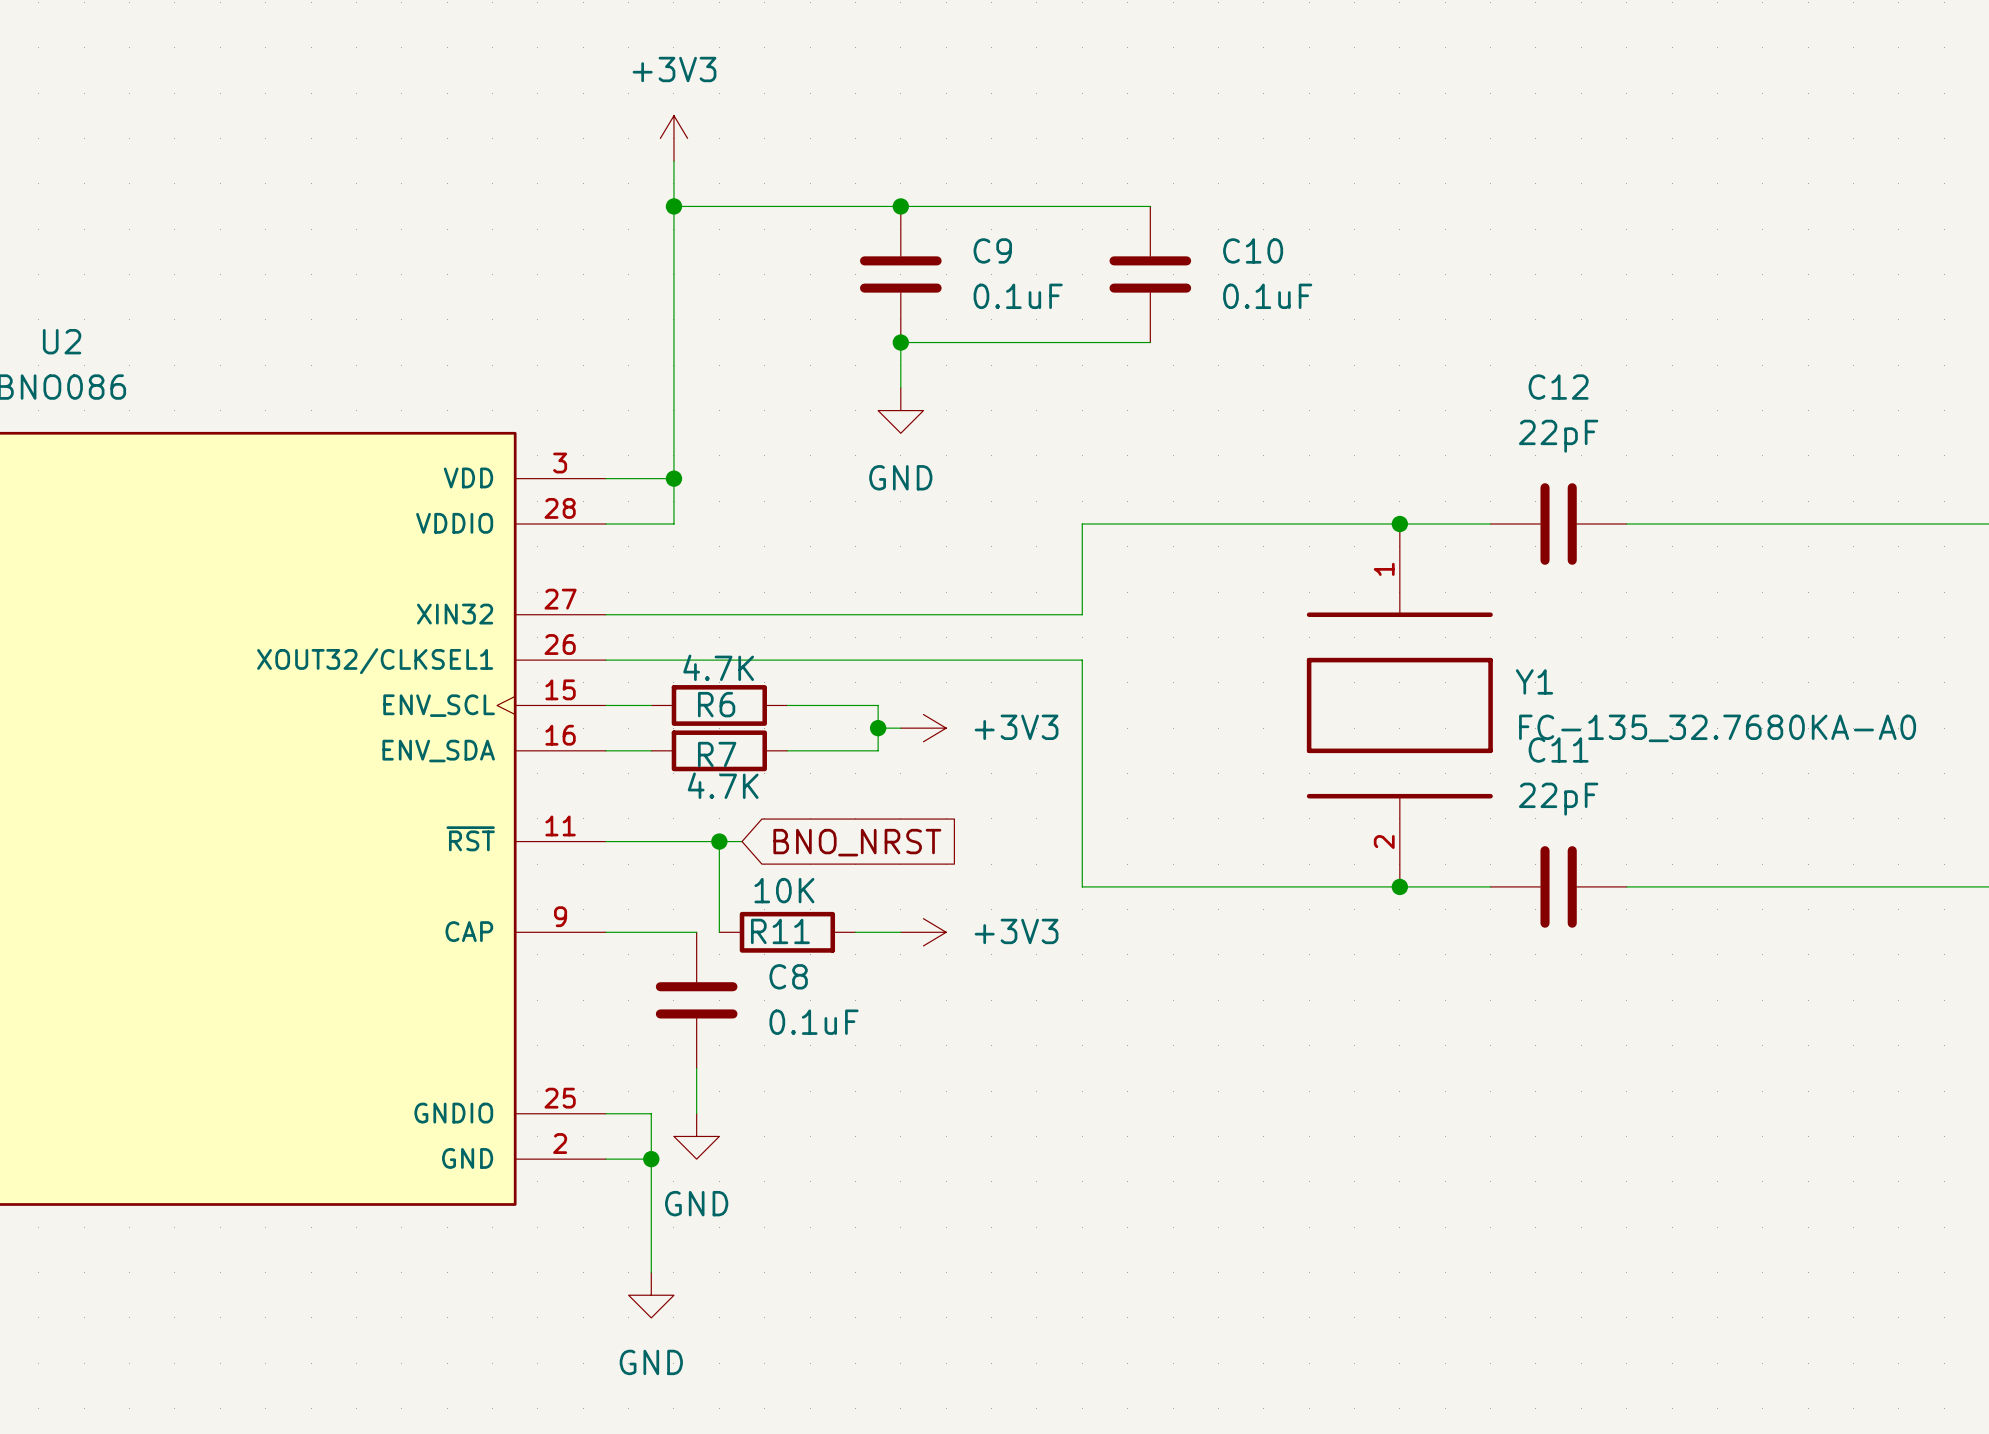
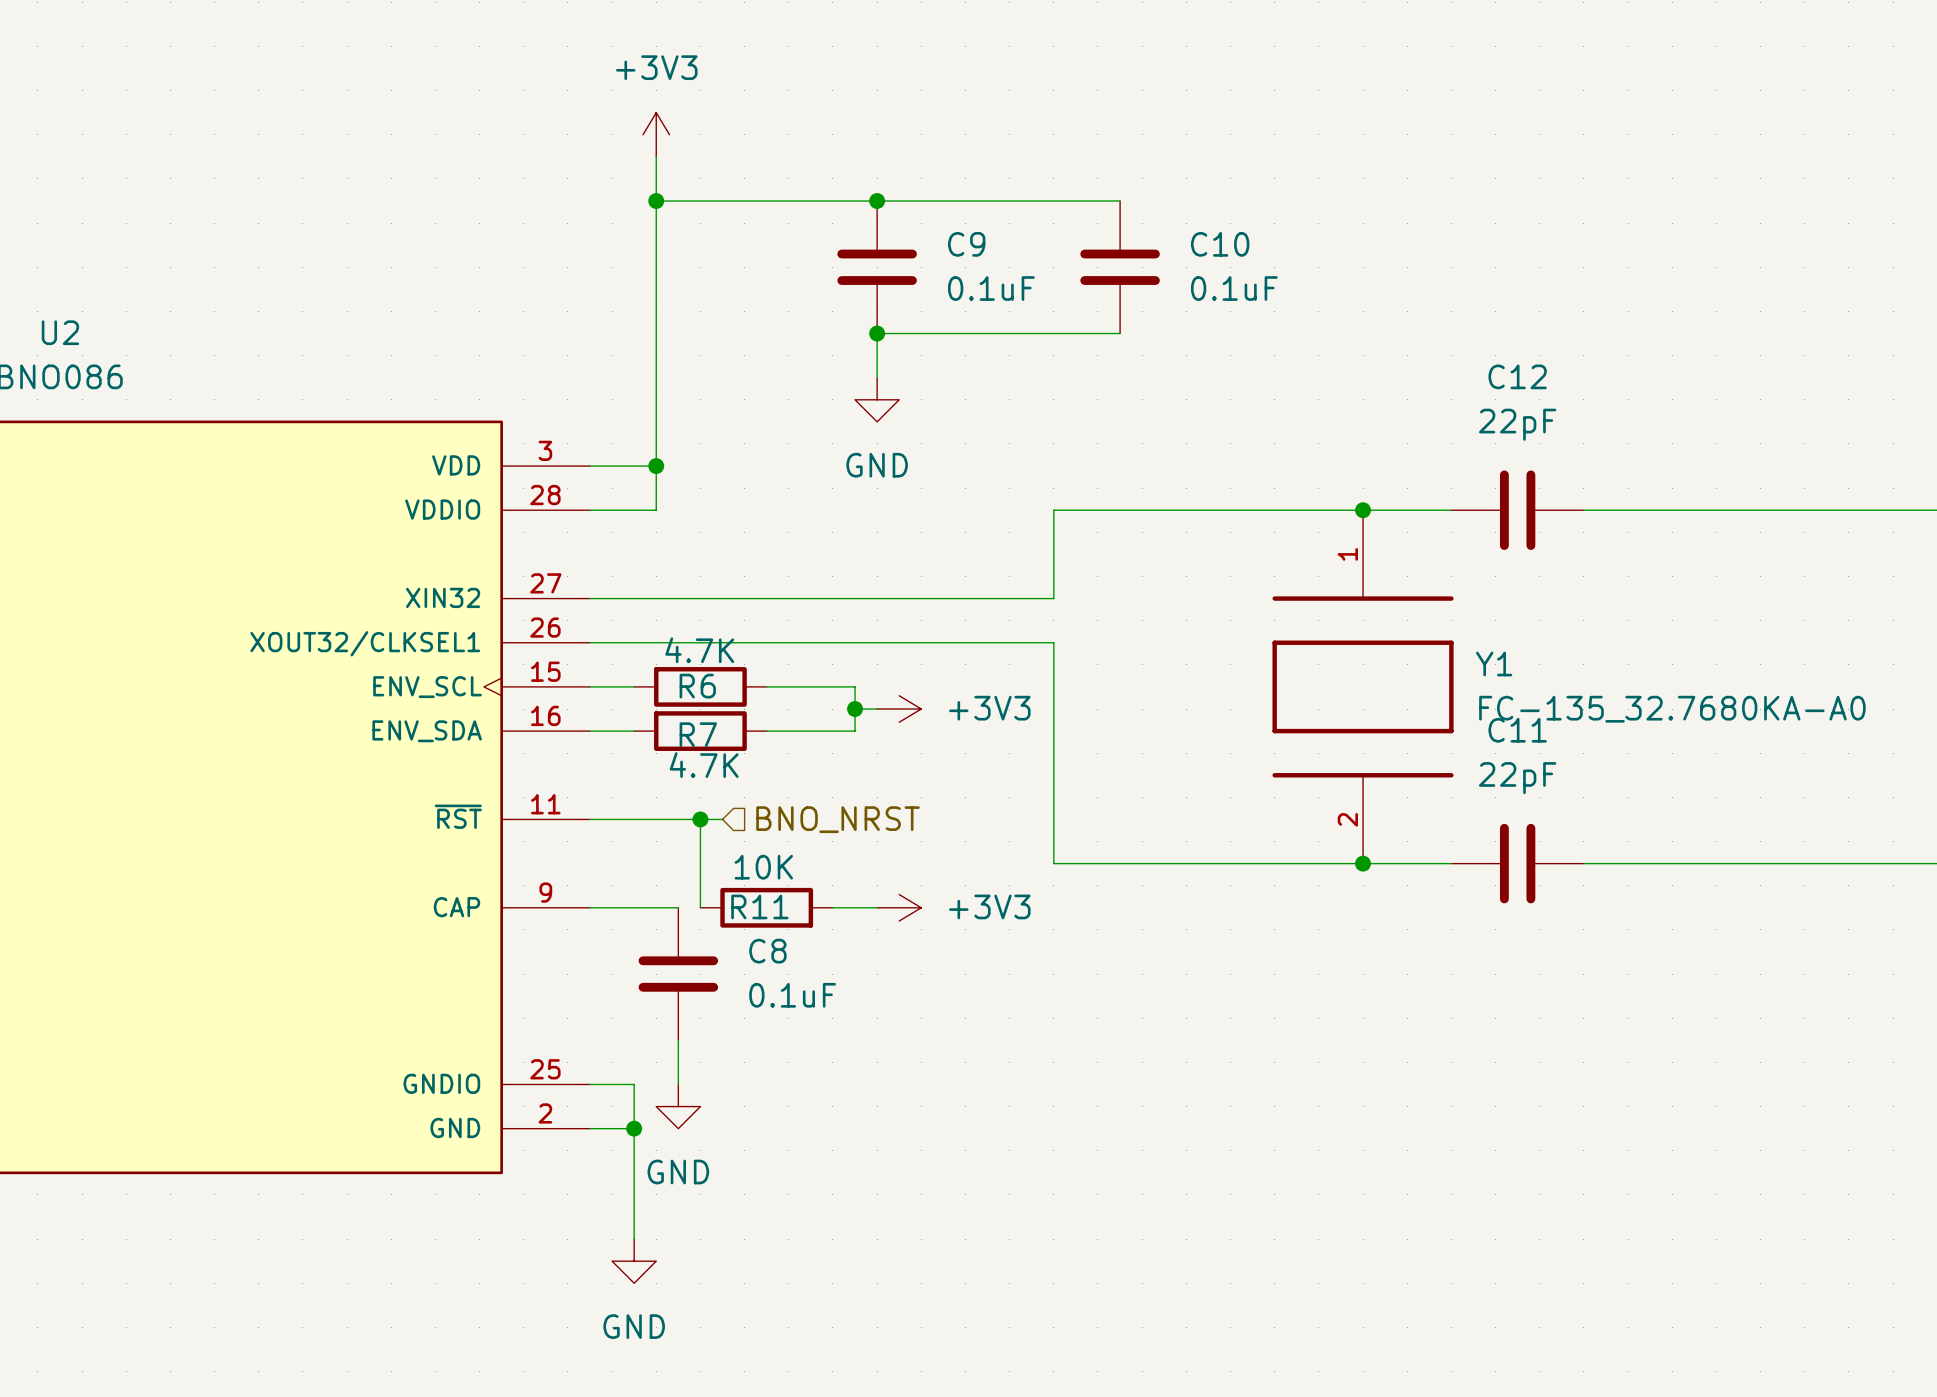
hierarchical label: none -> BNO_NRST (838, 819)
global label: BNO_NRST (857, 842) -> none

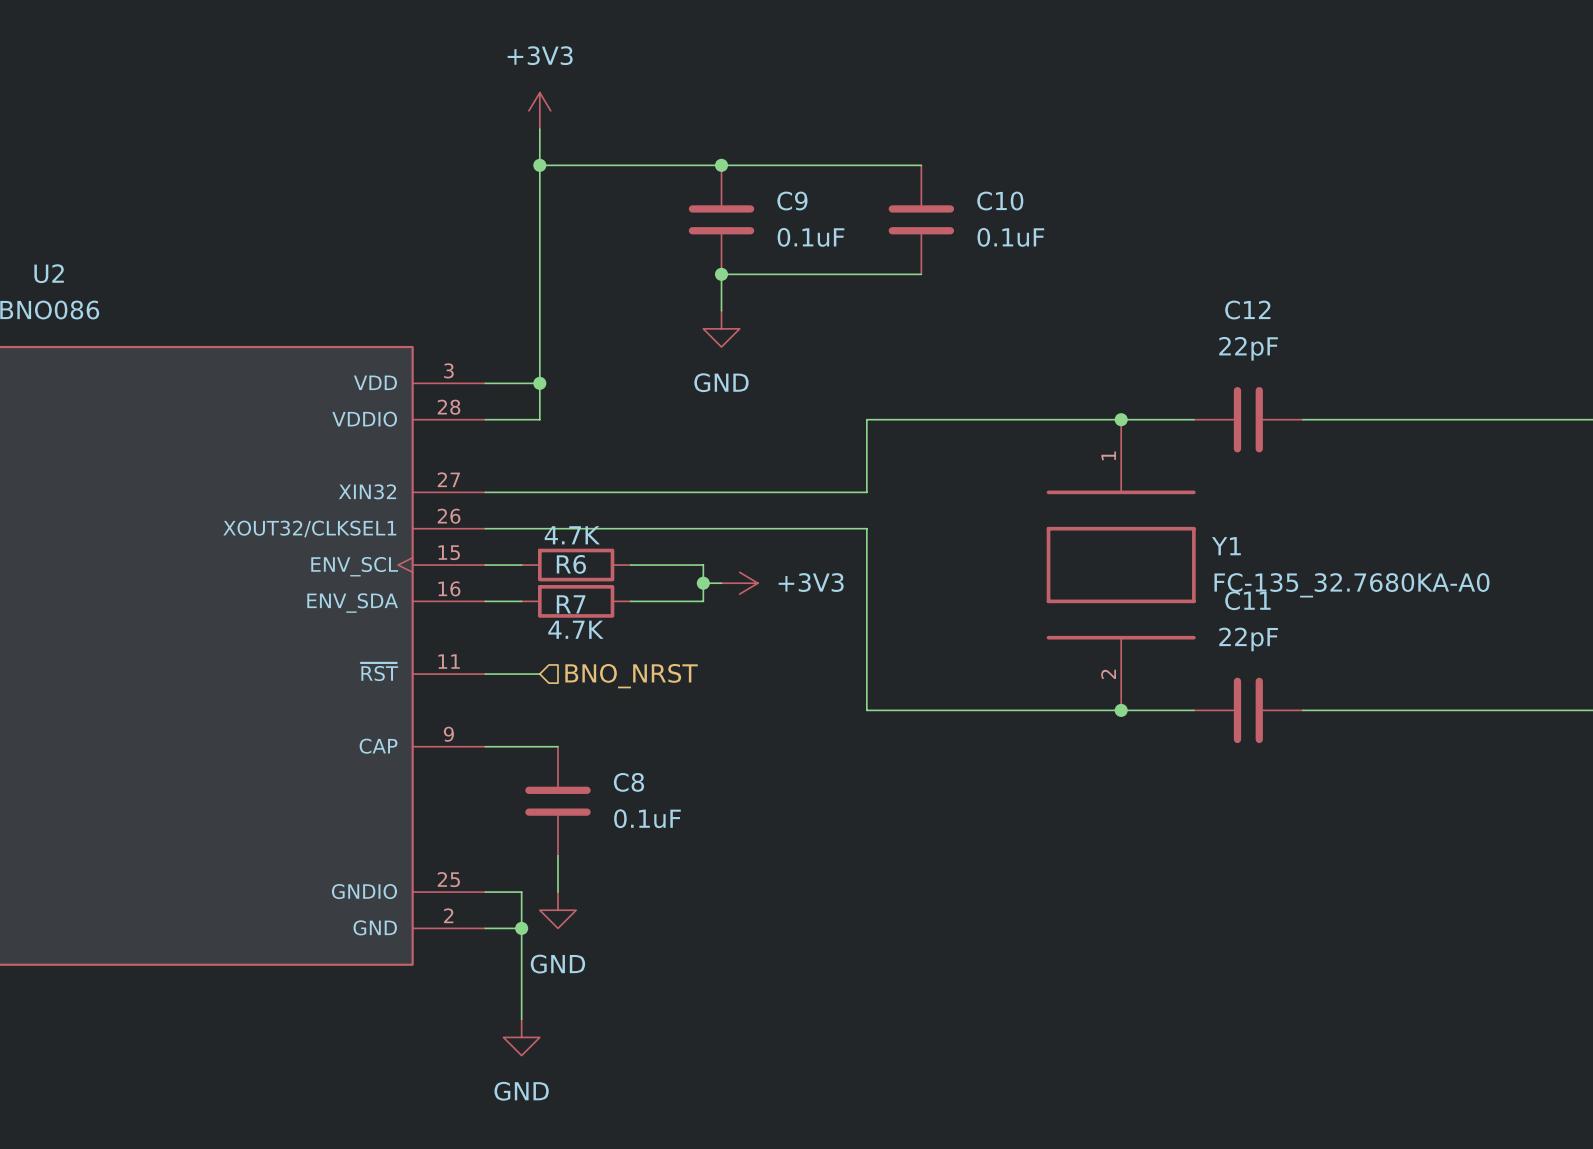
wire: (656, 819) (722, 819) -> none
wire: (700, 819) (700, 907) -> none
junction: (700, 819) -> none
hierarchical label position: BNO_NRST (838, 819) -> BNO_NRST (631, 676)
R11: 10K (766, 907) -> none
wire: (832, 907) (877, 907) -> none
power symbol: +3V3 (899, 907) -> none

